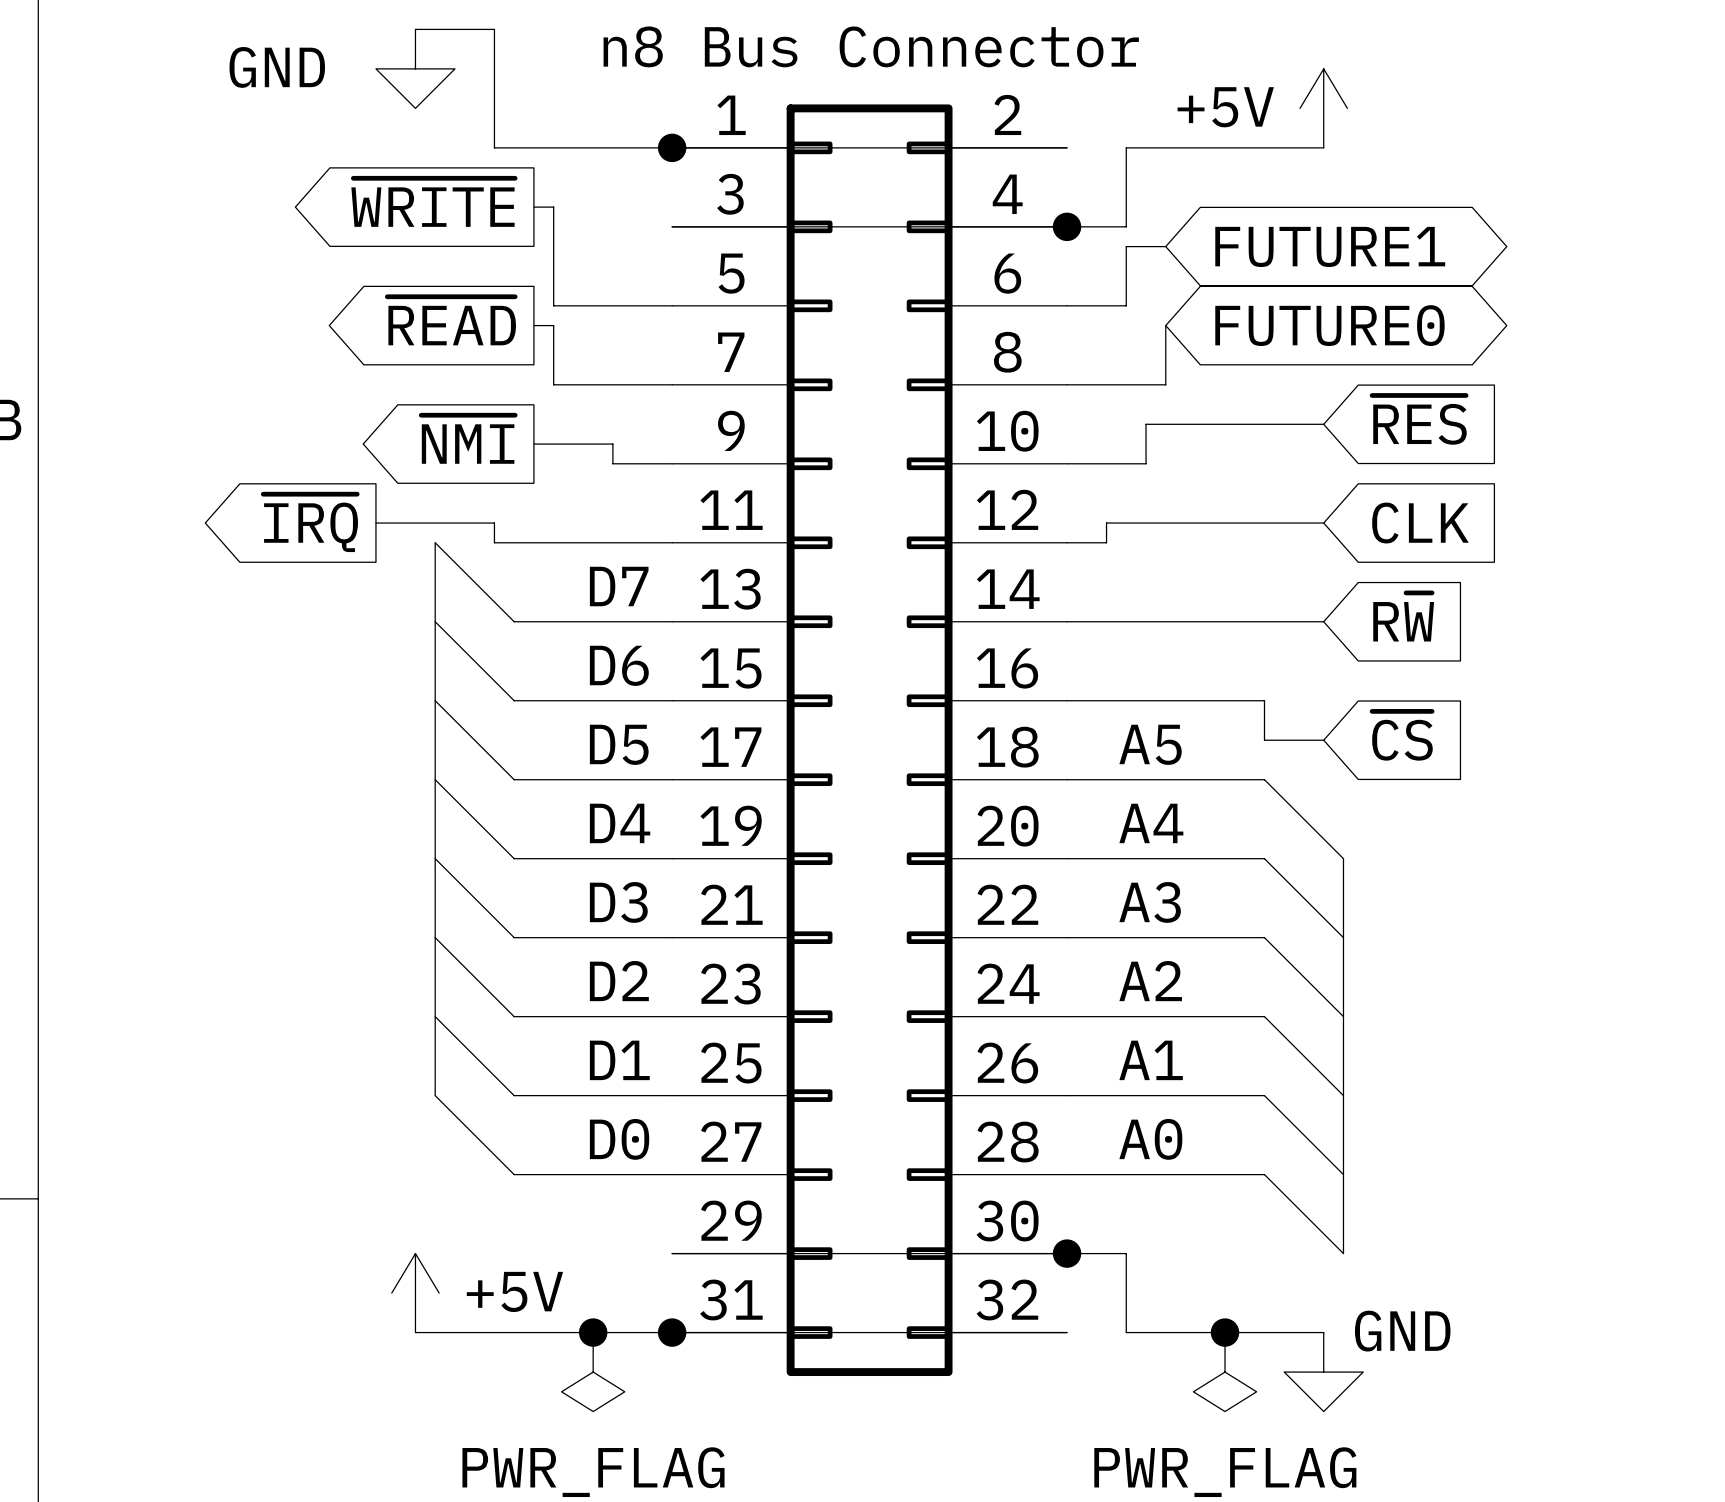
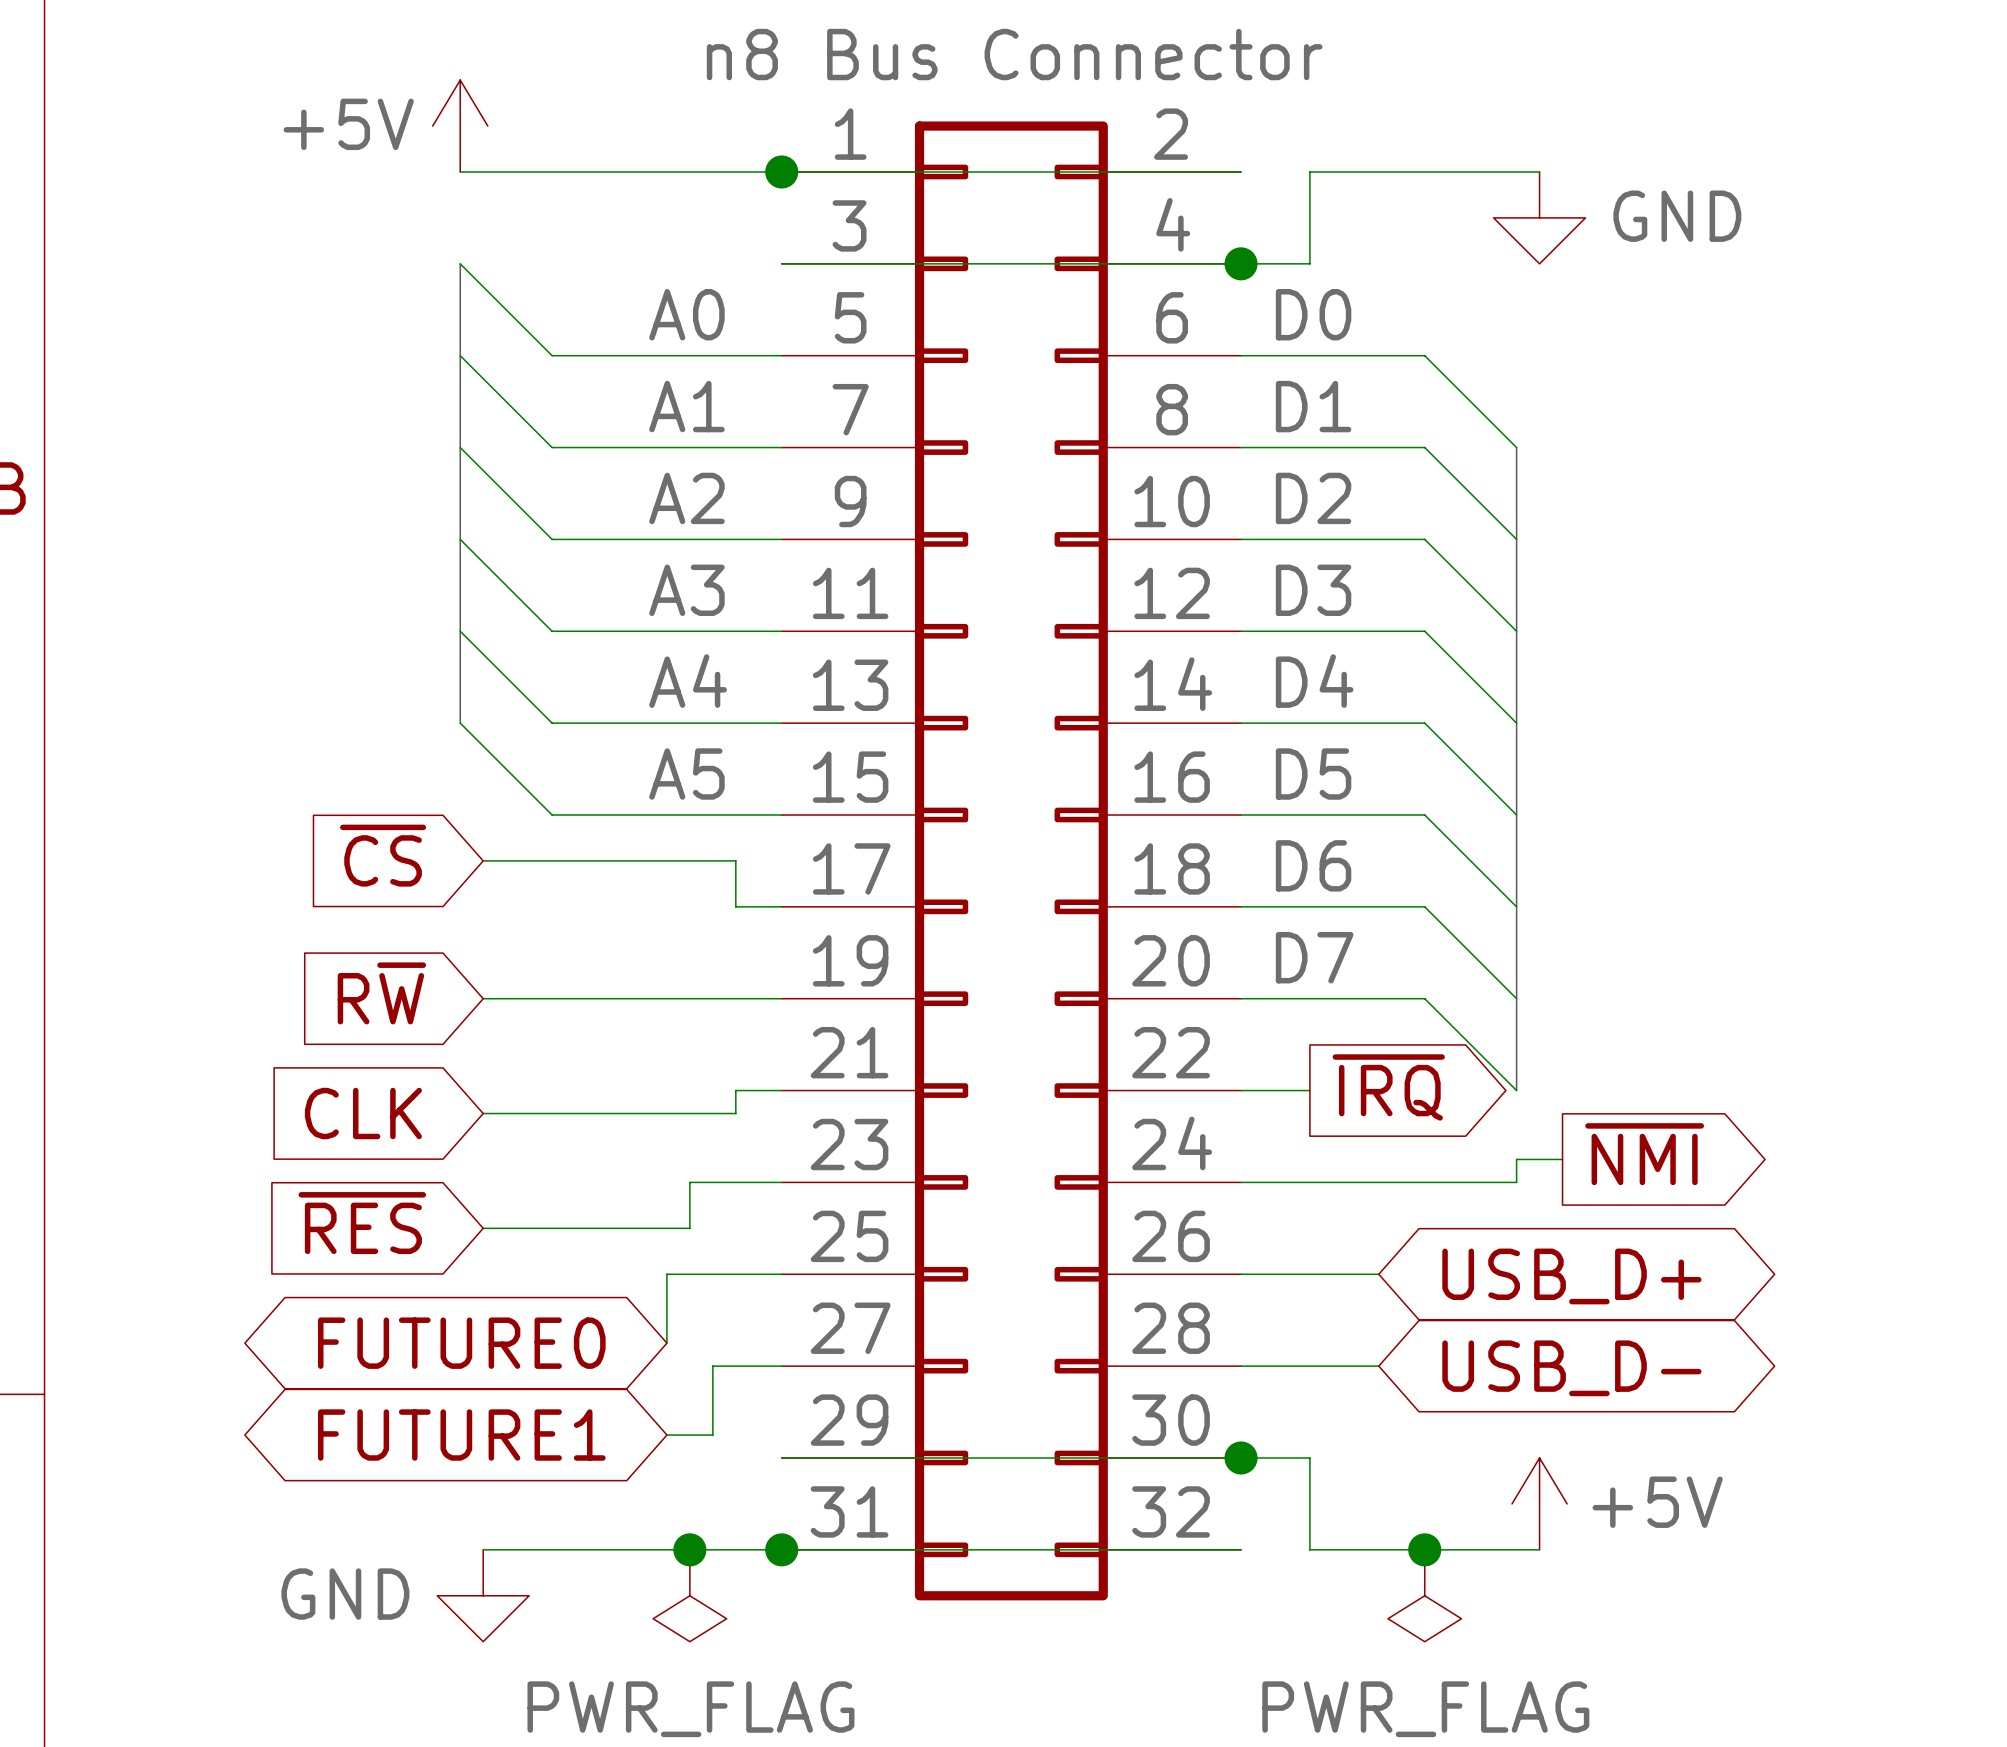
wire: (415, 29) (494, 29) (494, 147) -> (460, 171) (575, 171)
power symbol: GND (415, 68) -> none
power symbol: none -> +5V (460, 126)
power symbol: +5V (1323, 108) -> none
power symbol: none -> GND (1539, 217)
global label: ~{WRITE} (433, 202) -> none
wire: (533, 207) (553, 207) (553, 305) -> (460, 263) (552, 355) (643, 355)
bus: none -> (460, 263) (460, 723)
wire: (1165, 246) (1126, 246) (1126, 305) -> (1516, 447) (1424, 355) (1309, 355)
global label: FUTURE1 (1330, 246) -> none
label: none -> A0 (686, 314)
label: none -> D0 (1313, 314)
global label: ~{READ} (451, 321) -> none
wire: (533, 325) (553, 325) (553, 384) -> (460, 355) (552, 447) (643, 447)
wire: (1165, 325) (1165, 384) -> (1516, 539) (1424, 447) (1355, 447)
global label: FUTURE0 (1329, 325) -> none
label: none -> A1 (686, 406)
label: none -> D1 (1313, 406)
bus: none -> (1516, 447) (1516, 1090)
global label: ~{RES} (1419, 420) -> none
wire: (1323, 424) (1146, 424) (1146, 463) -> (1516, 631) (1424, 539) (1332, 539)
label: none -> A2 (686, 498)
global label: ~{NMI} (468, 439) -> none
wire: (533, 444) (612, 444) (612, 463) -> (460, 447) (552, 539) (712, 539)
global label: ~{IRQ} (310, 523) -> none
wire: (375, 523) (494, 523) (494, 542) -> (460, 539) (552, 631) (575, 631)
wire: (1323, 523) (1106, 523) (1106, 542) -> (1516, 723) (1424, 631) (1286, 631)
global label: CLK (1420, 523) -> none
wire: (435, 542) (514, 621) -> (460, 631) (552, 723) (598, 723)
bus: (435, 542) (435, 1095) -> none
label position: D7 (619, 586) -> D7 (1314, 957)
global label: R~{W} (1403, 617) -> none
wire: (435, 621) (514, 700) -> (460, 723) (552, 814) (598, 814)
wire: (1225, 621) (1323, 621) -> (1424, 723) (1516, 814)
label position: D6 (619, 665) -> D6 (1313, 865)
wire: (435, 700) (514, 779) (632, 779) -> (483, 860) (735, 860) (735, 906)
wire: (1225, 700) (1264, 700) (1264, 740) (1323, 740) -> (1424, 814) (1516, 906)
global label: none -> ~{CS} (383, 855)
global label: ~{CS} (1402, 736) -> none
label position: D5 (619, 744) -> D5 (1313, 774)
label position: A5 (1150, 744) -> A5 (686, 774)
wire: (435, 779) (514, 858) -> (483, 998) (598, 998)
wire: (1225, 779) (1264, 779) (1343, 858) -> (1424, 906) (1516, 998)
label position: D4 (620, 823) -> D4 (1314, 681)
label position: A4 (1151, 823) -> A4 (688, 681)
global label: none -> R~{W} (381, 993)
wire: (435, 858) (514, 937) (632, 937) -> (483, 1113) (735, 1113) (735, 1090)
wire: (1225, 858) (1264, 858) (1343, 937) -> (1424, 998) (1516, 1090)
bus: (1343, 858) (1343, 1253) -> none
label position: D3 (618, 902) -> D3 (1313, 590)
label position: A3 (1150, 902) -> A3 (686, 590)
wire: (435, 937) (514, 1016) (593, 1016) -> (483, 1228) (689, 1228) (689, 1182)
wire: (1126, 937) (1264, 937) (1343, 1016) -> none
global label: none -> ~{IRQ} (1388, 1087)
global label: none -> CLK (363, 1113)
label position: D2 (619, 981) -> D2 (1313, 498)
label: A2 (1150, 981) -> none
global label: none -> ~{NMI} (1644, 1154)
wire: (435, 1016) (514, 1095) (573, 1095) -> (666, 1343) (666, 1274)
wire: (1264, 1016) (1343, 1095) -> (1470, 1182) (1516, 1182) (1516, 1159) (1562, 1159)
global label: none -> ~{RES} (362, 1223)
label: D1 (619, 1060) -> none
label: A1 (1151, 1060) -> none
wire: (435, 1095) (514, 1174) (612, 1174) -> (666, 1435) (712, 1435) (712, 1366)
wire: (1185, 1095) (1264, 1095) (1343, 1174) -> none
global label: none -> USB_D+ (1571, 1276)
label: D0 (619, 1139) -> none
label: A0 (1150, 1139) -> none
global label: none -> FUTURE0 (461, 1343)
wire: (1185, 1174) (1264, 1174) (1343, 1253) -> none
global label: none -> USB_D- (1571, 1368)
global label: none -> FUTURE1 (461, 1435)
power symbol: +5V (415, 1293) -> none
power symbol: none -> +5V (1539, 1503)
power symbol: none -> GND (483, 1595)
power symbol: GND (1323, 1372) -> none

